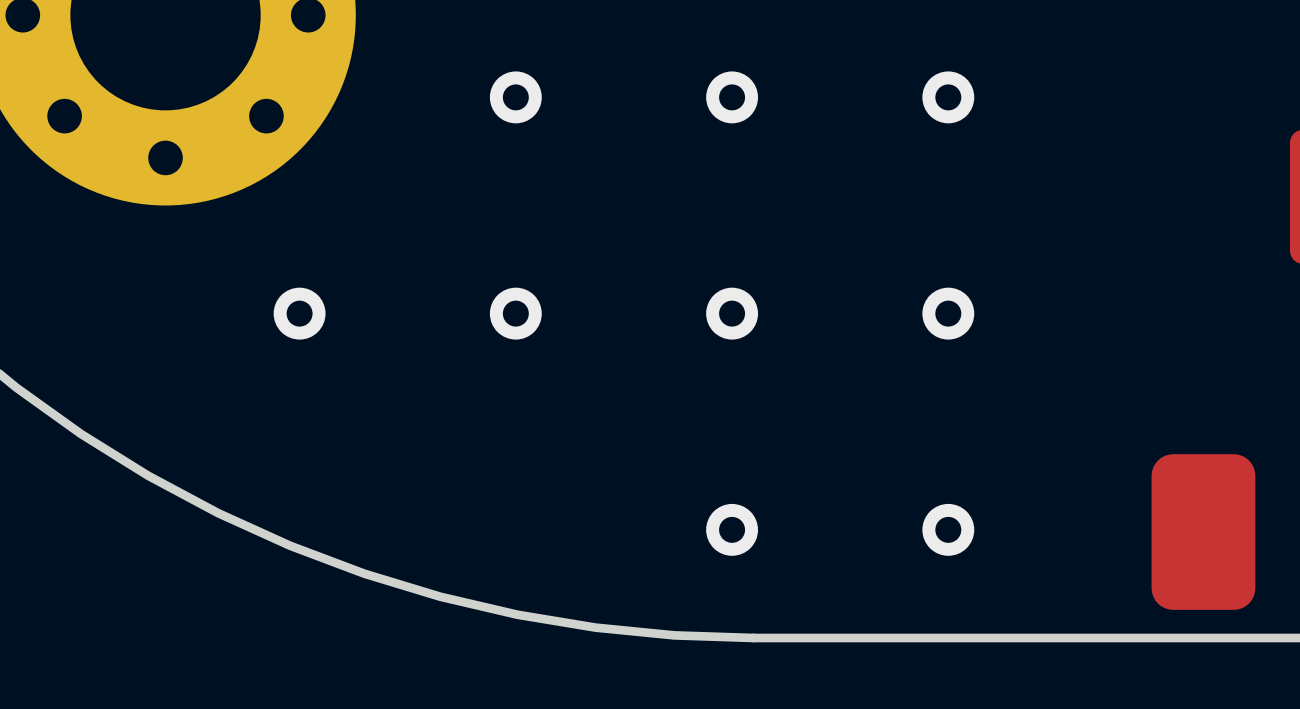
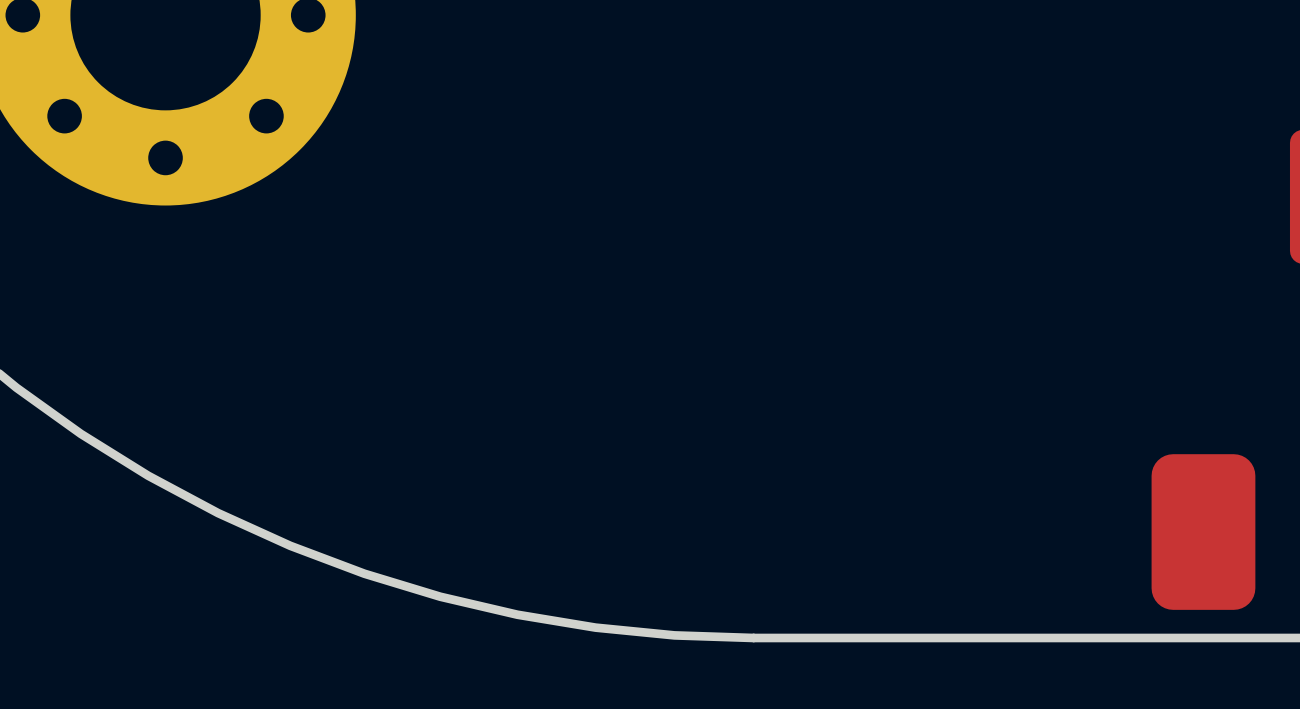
via: (515, 97) -> none
via: (732, 97) -> none
via: (948, 97) -> none
via: (299, 313) -> none
via: (515, 313) -> none
via: (732, 313) -> none
via: (948, 313) -> none
via: (732, 529) -> none
via: (948, 529) -> none

